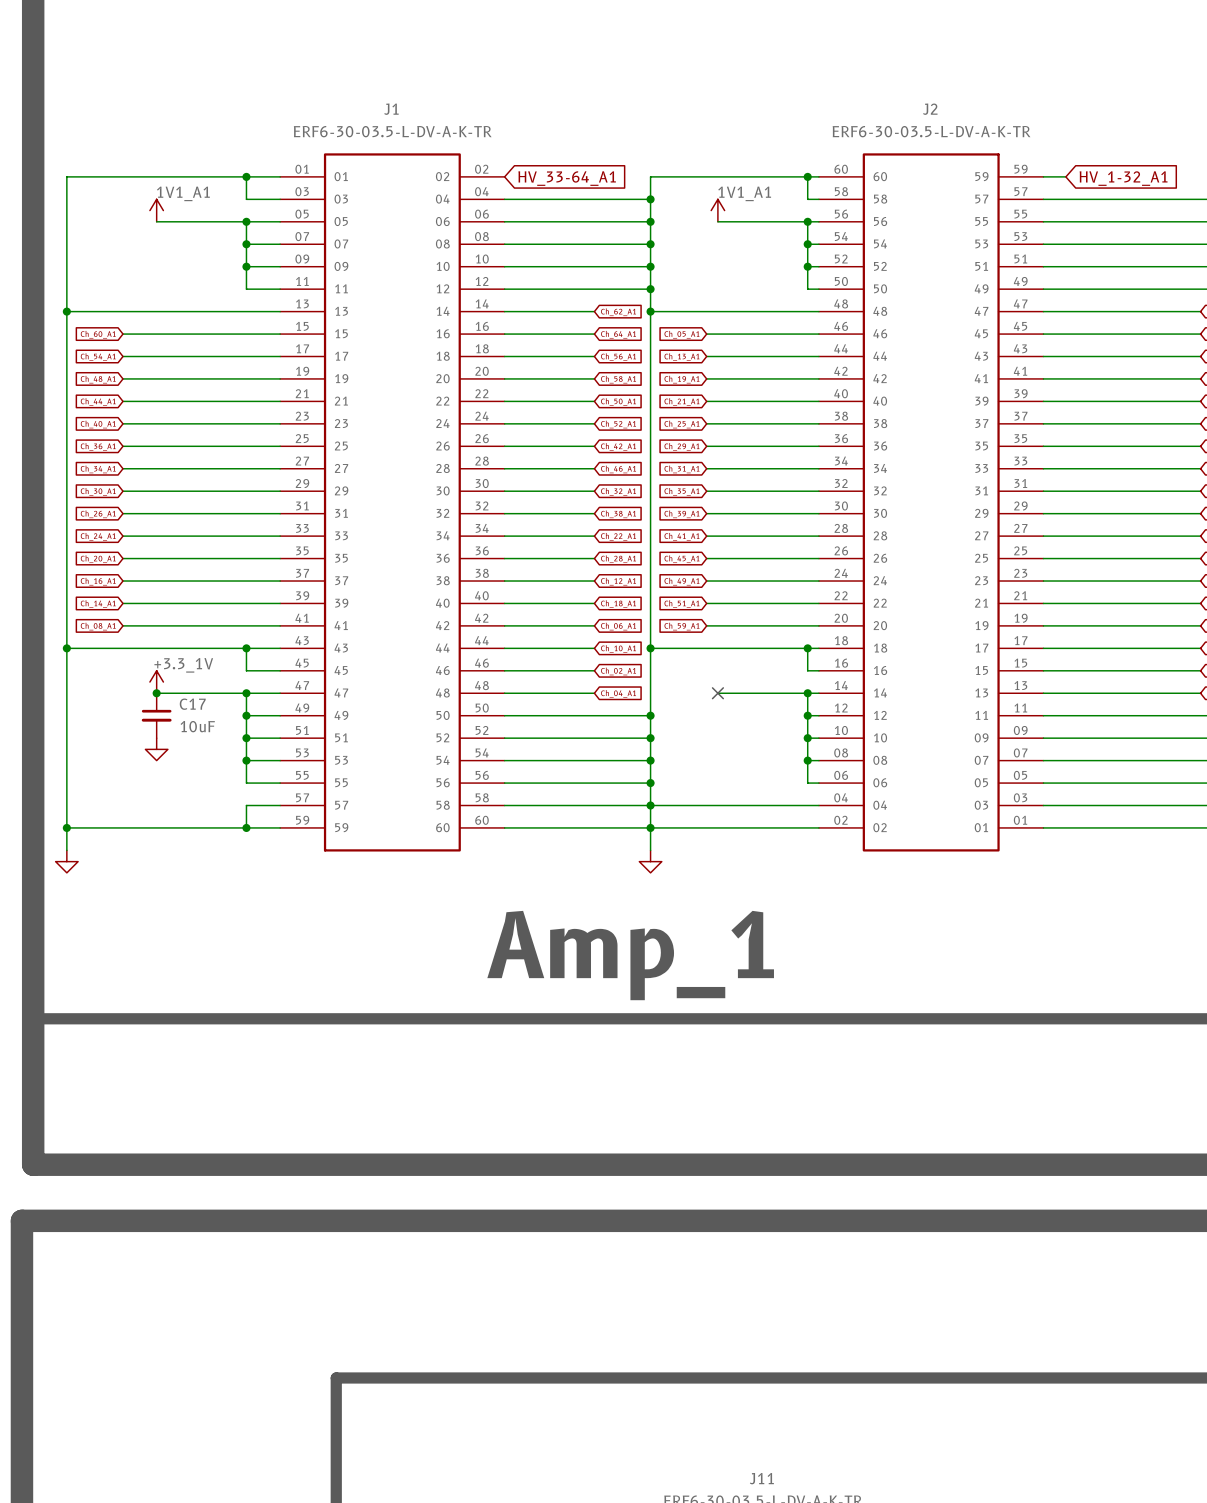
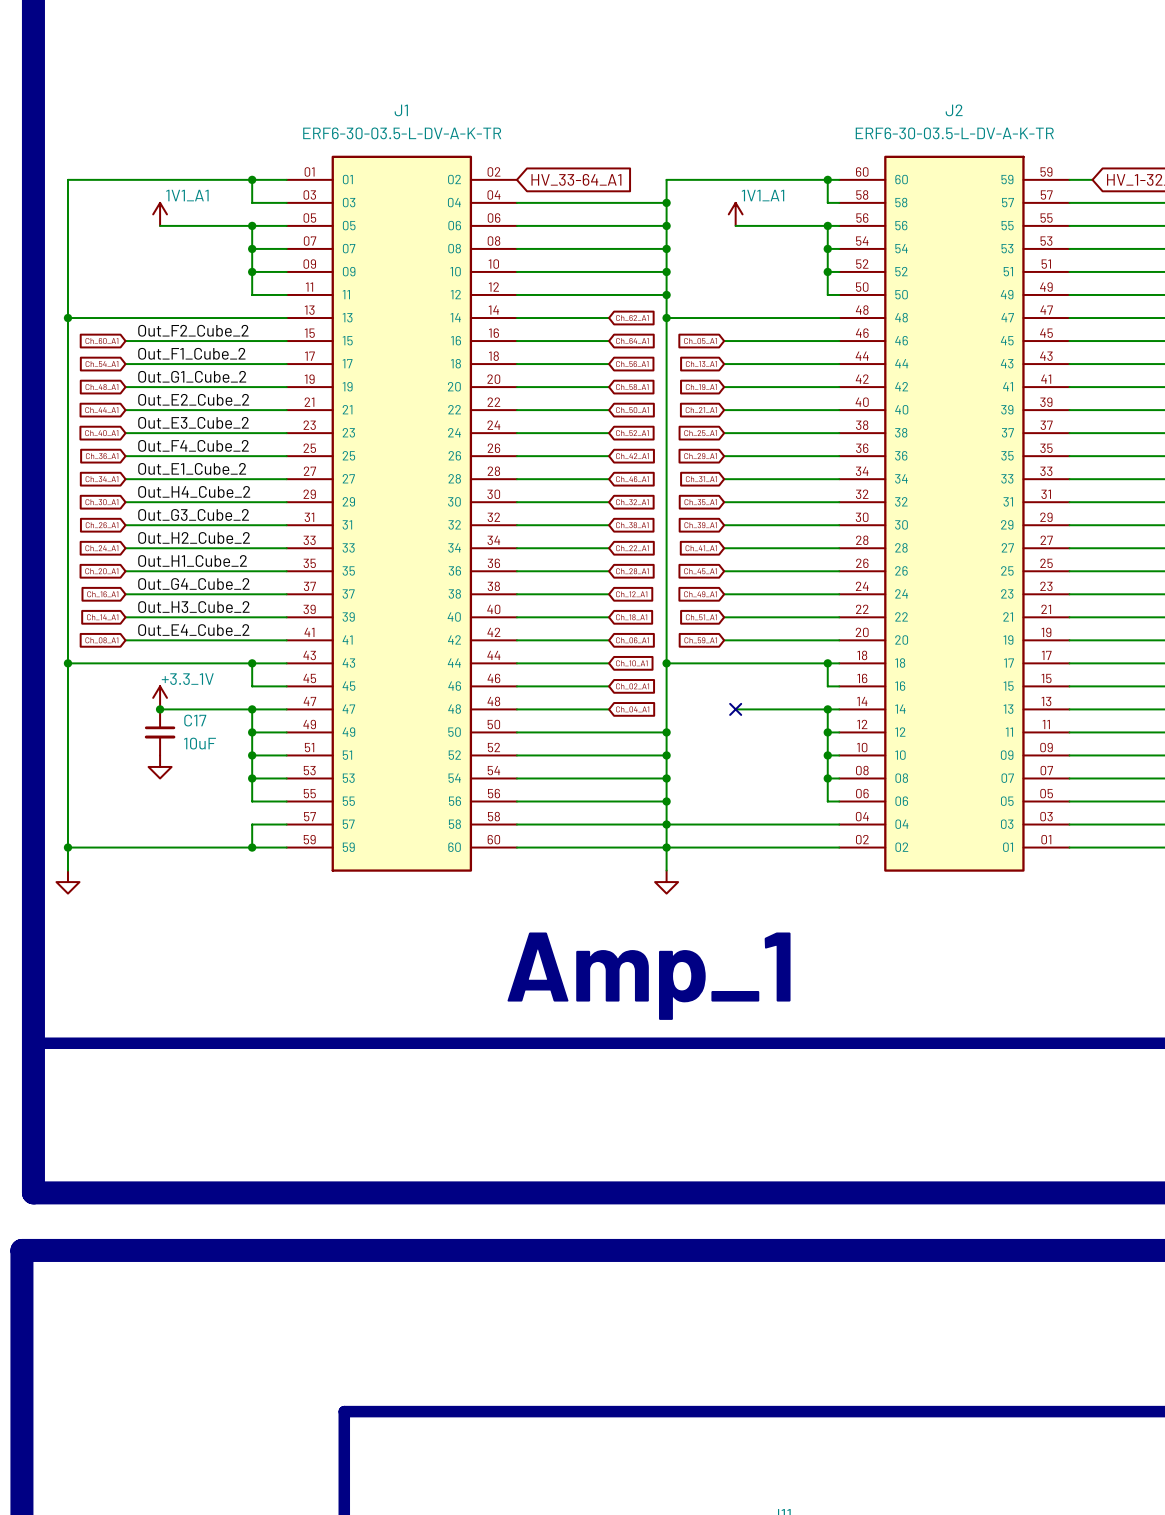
label: none -> Out_F2_Cube_2 (193, 330)
label: none -> Out_F1_Cube_2 (191, 353)
label: none -> Out_G1_Cube_2 (192, 376)
label: none -> Out_E2_Cube_2 (193, 399)
label: none -> Out_E3_Cube_2 (193, 422)
label: none -> Out_F4_Cube_2 (193, 445)
label: none -> Out_E1_Cube_2 (192, 468)
label: none -> Out_H4_Cube_2 (194, 491)
label: none -> Out_G3_Cube_2 (193, 514)
label: none -> Out_H2_Cube_2 (194, 537)
label: none -> Out_H1_Cube_2 (192, 561)
label: none -> Out_G4_Cube_2 (193, 584)
label: none -> Out_H3_Cube_2 (193, 607)
label: none -> Out_E4_Cube_2 (193, 630)

